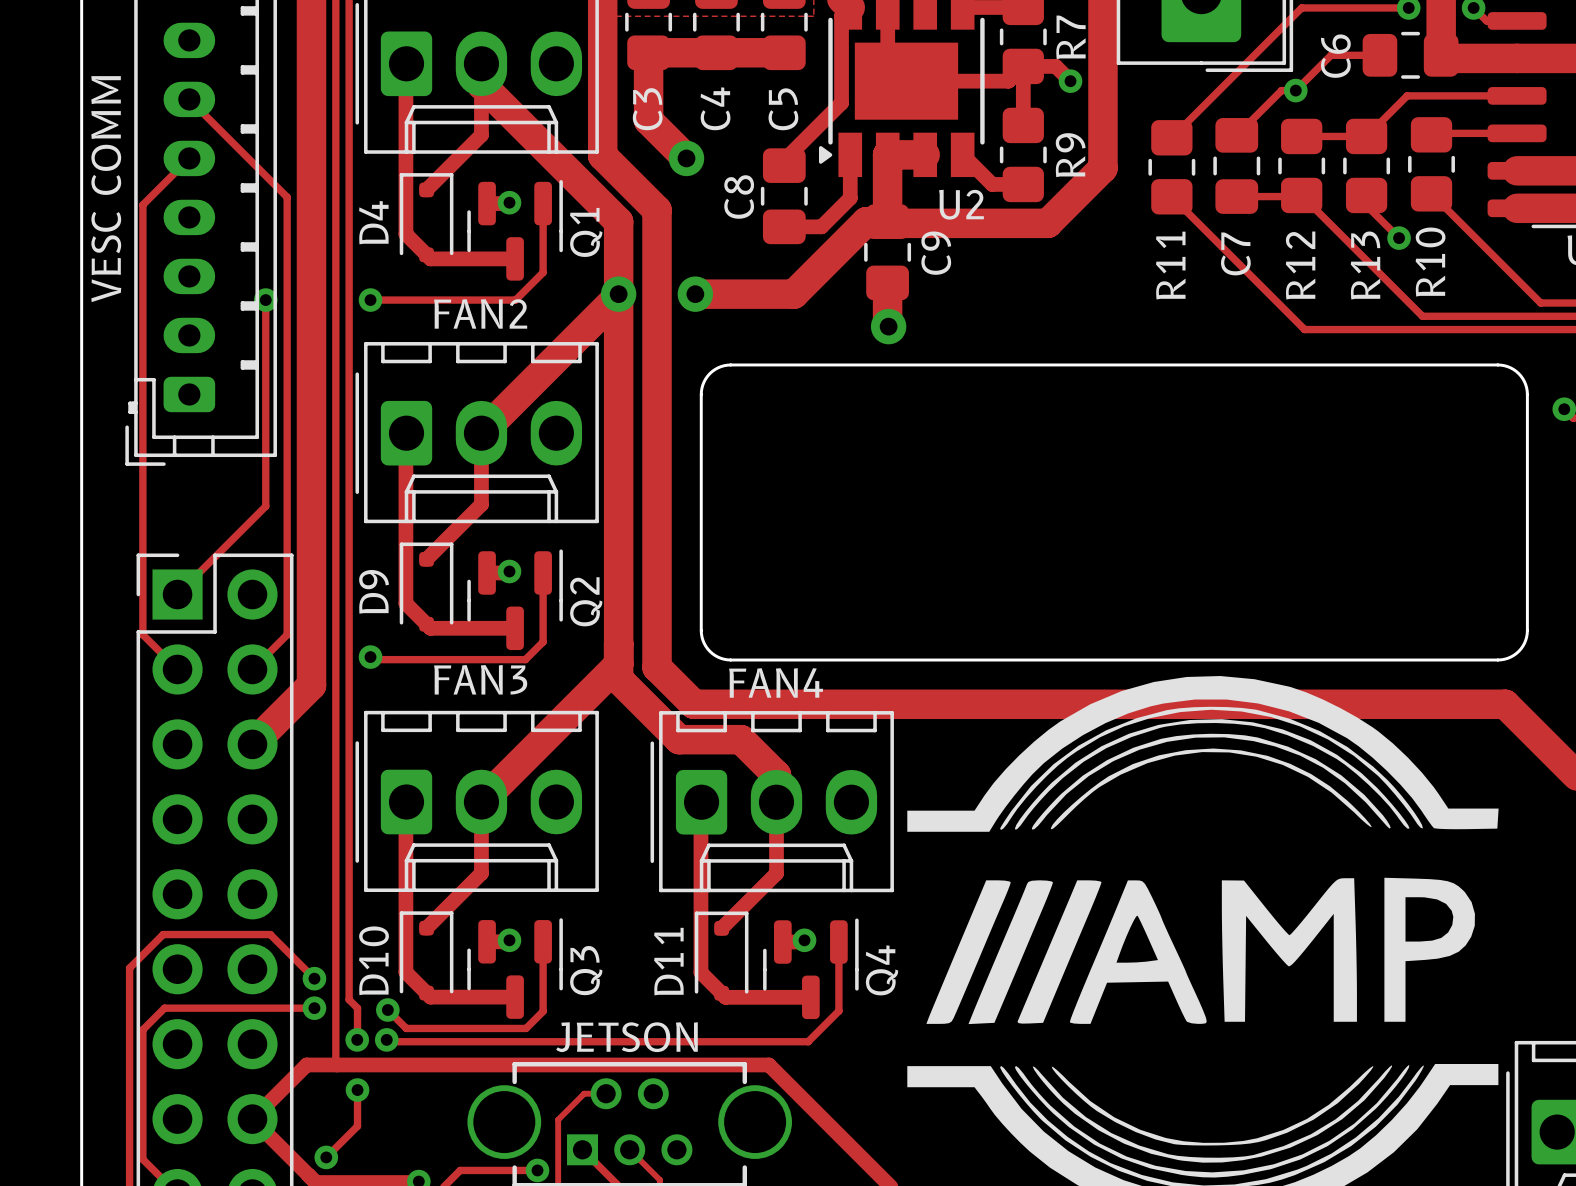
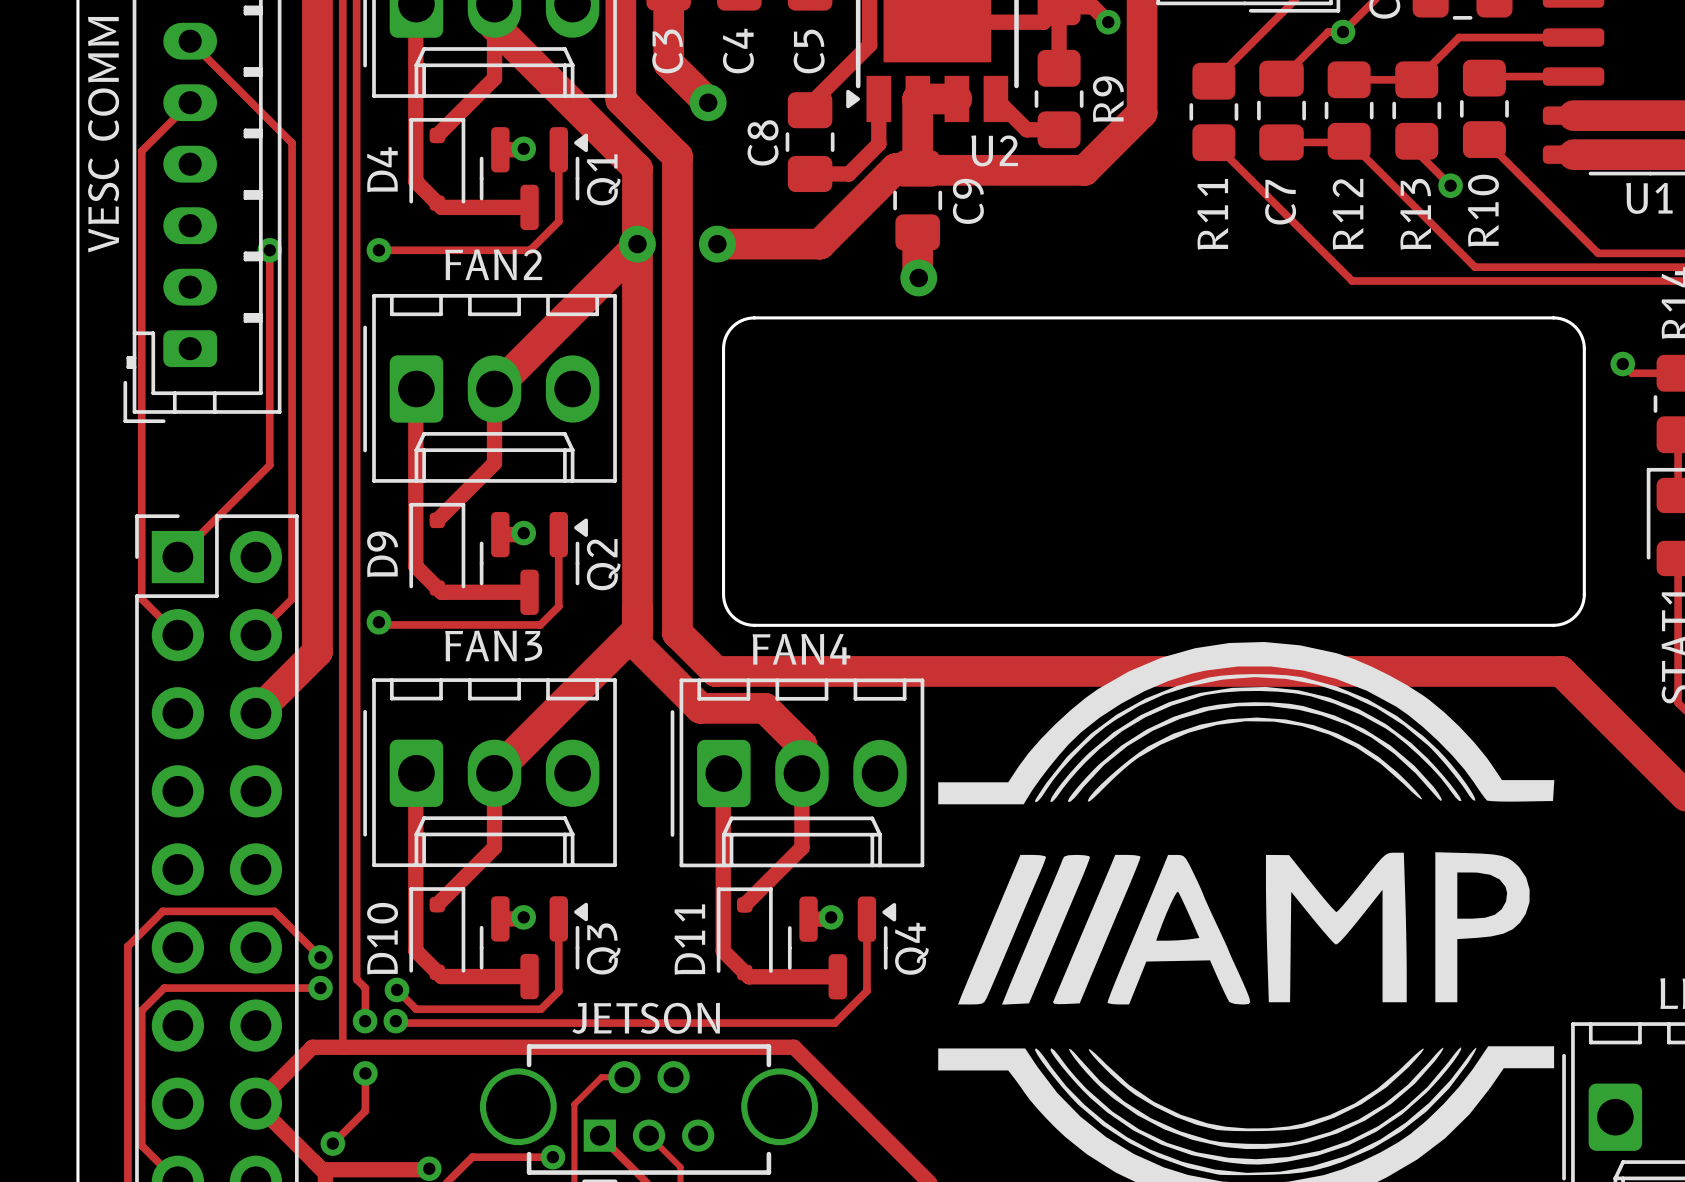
Q1 footprint: [467, 180, 563, 281] -> [479, 127, 588, 231]
Q2 footprint: [467, 549, 563, 651] -> [479, 511, 588, 615]
Q3 footprint: [467, 918, 563, 1019] -> [479, 896, 588, 1000]
Q4 footprint: [763, 918, 859, 1020] -> [787, 896, 897, 1000]

